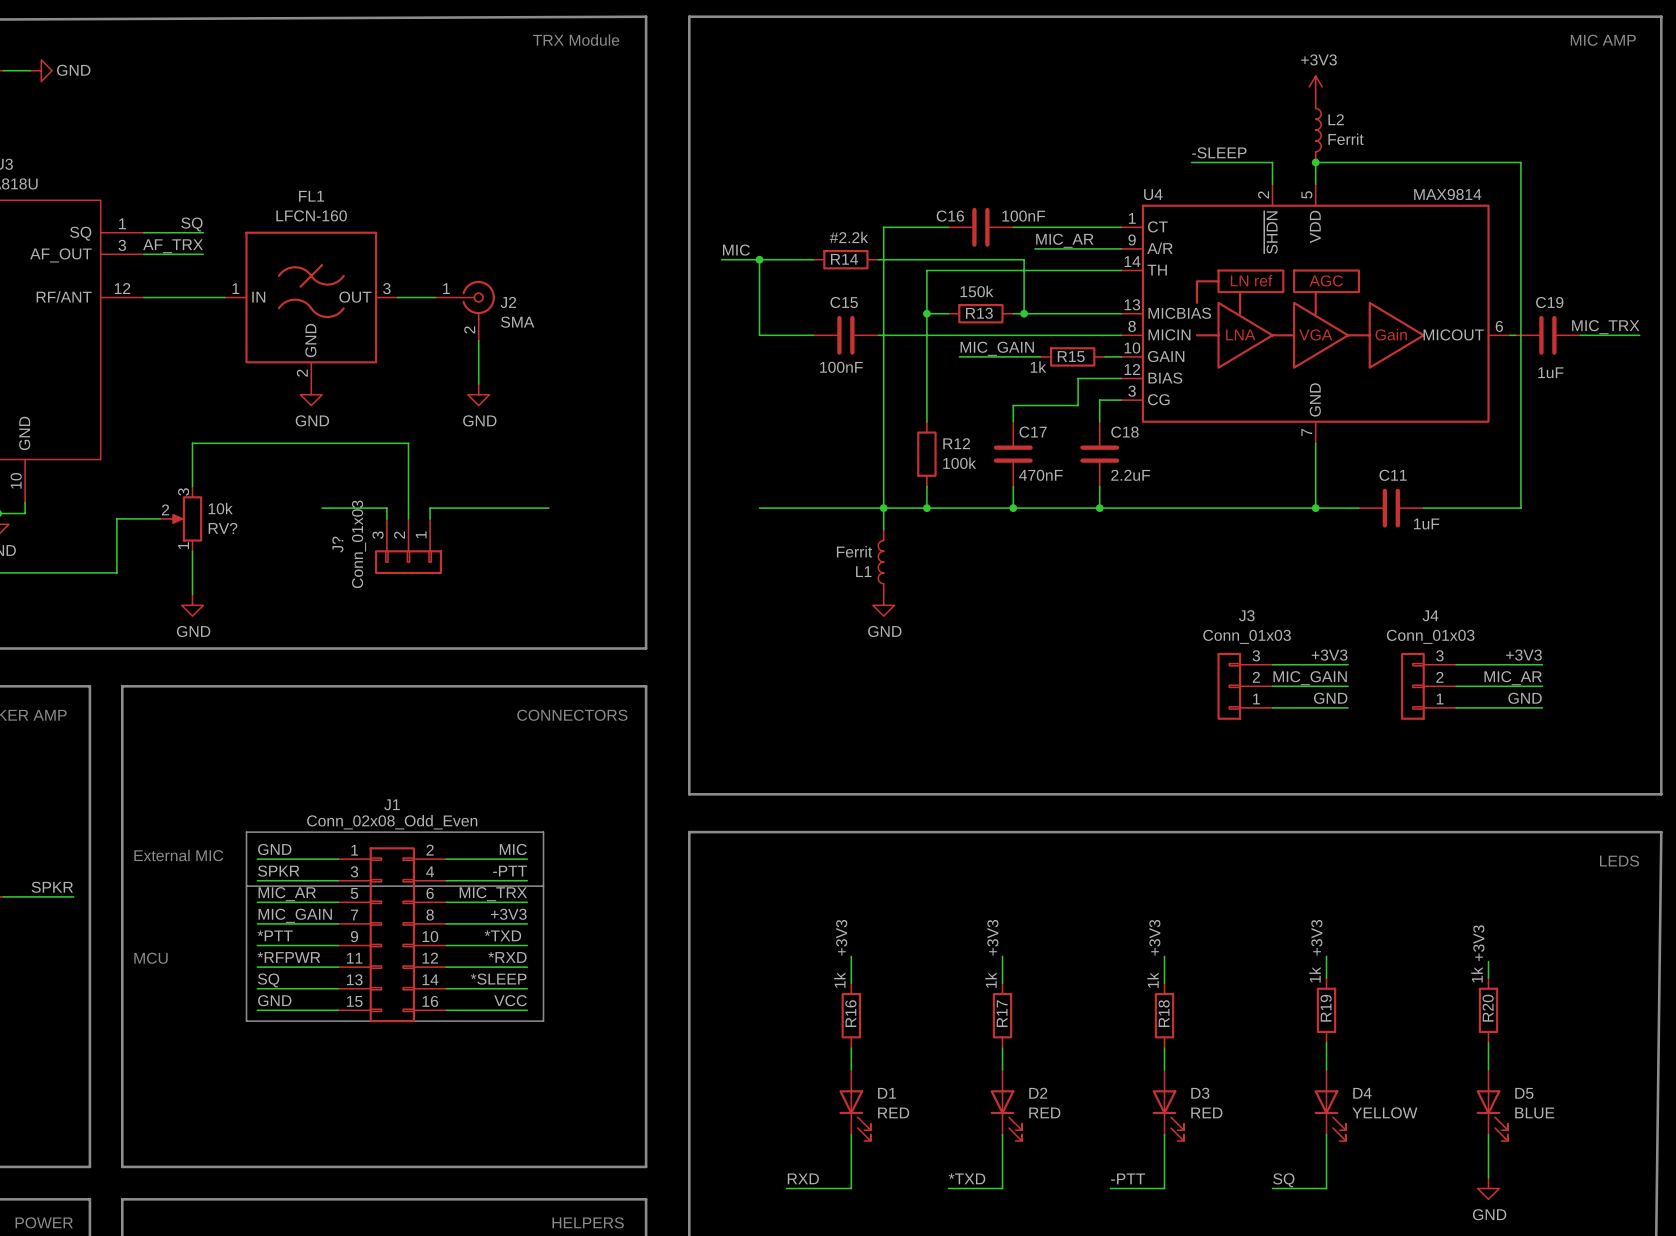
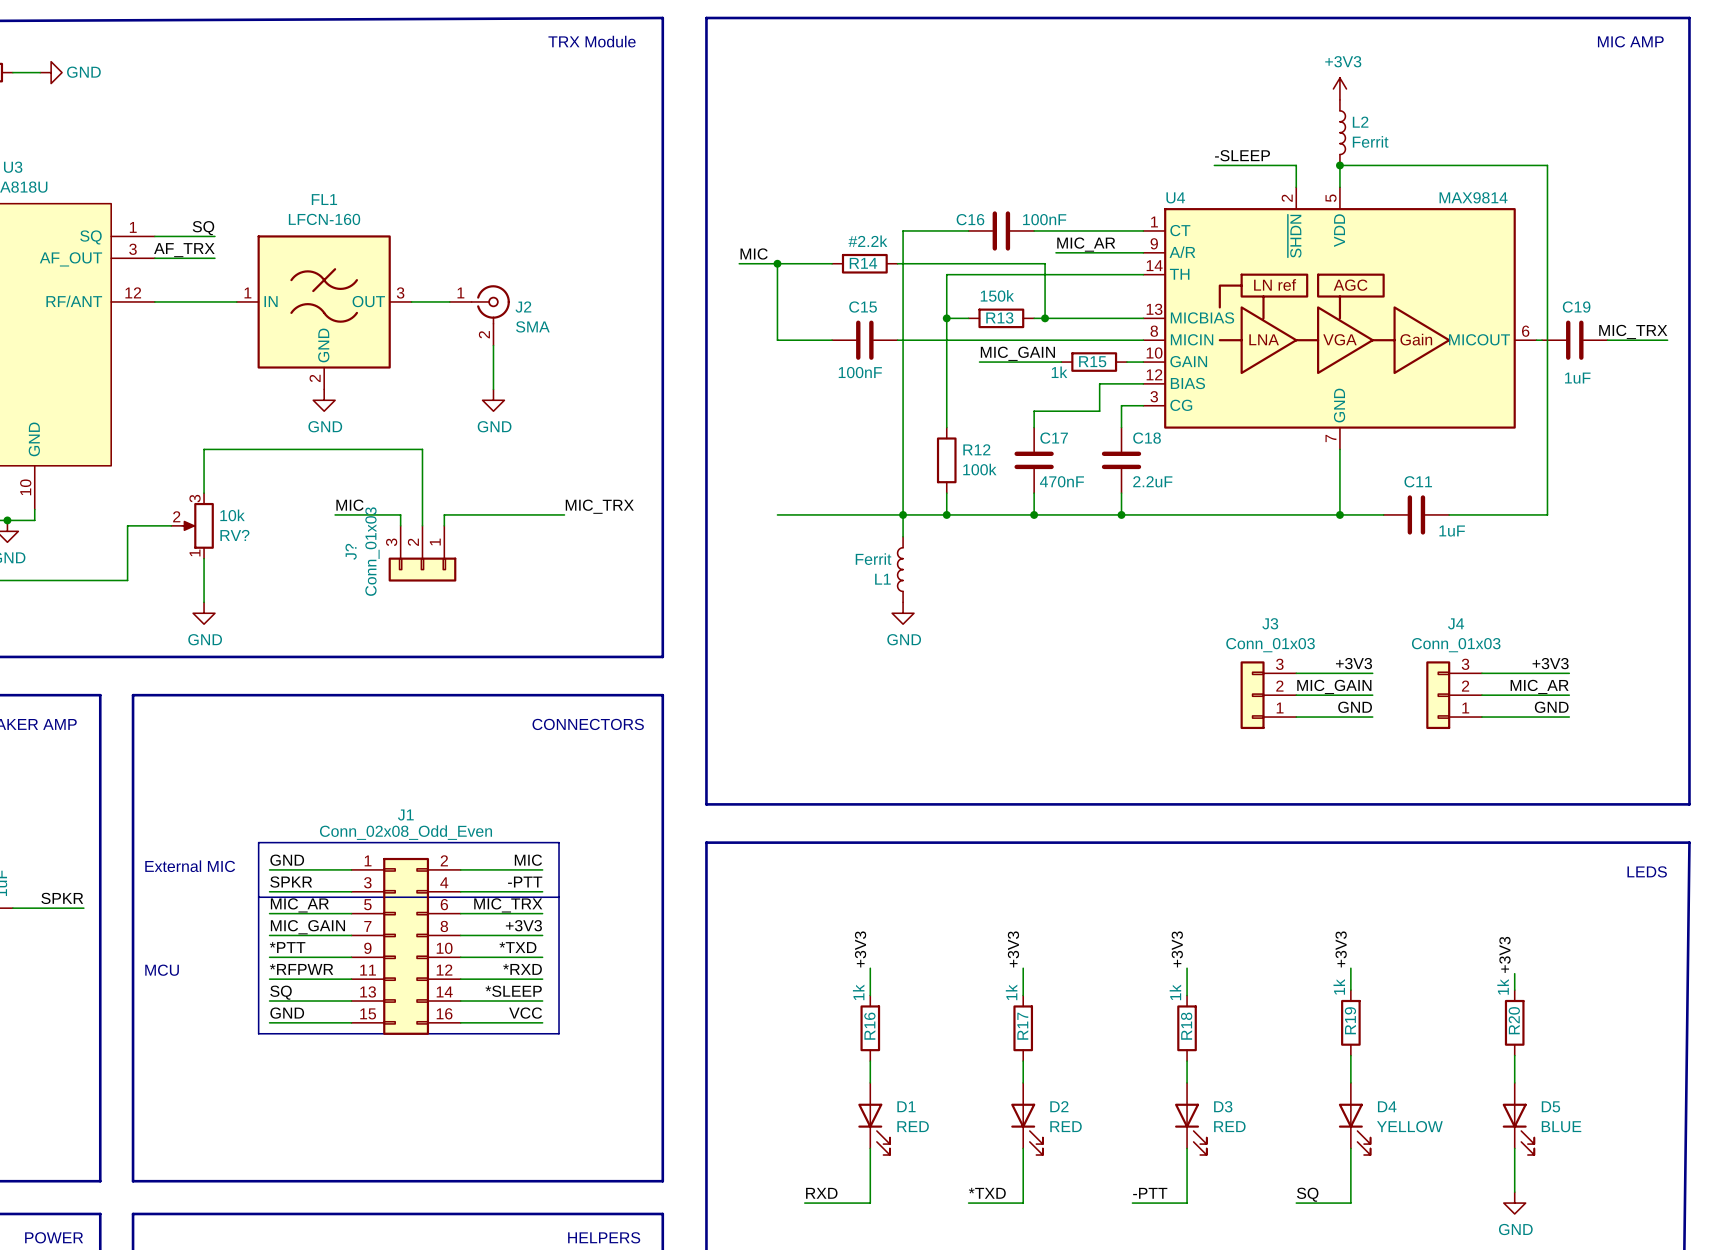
label: none -> MIC (350, 505)
label: none -> MIC_TRX (599, 506)

